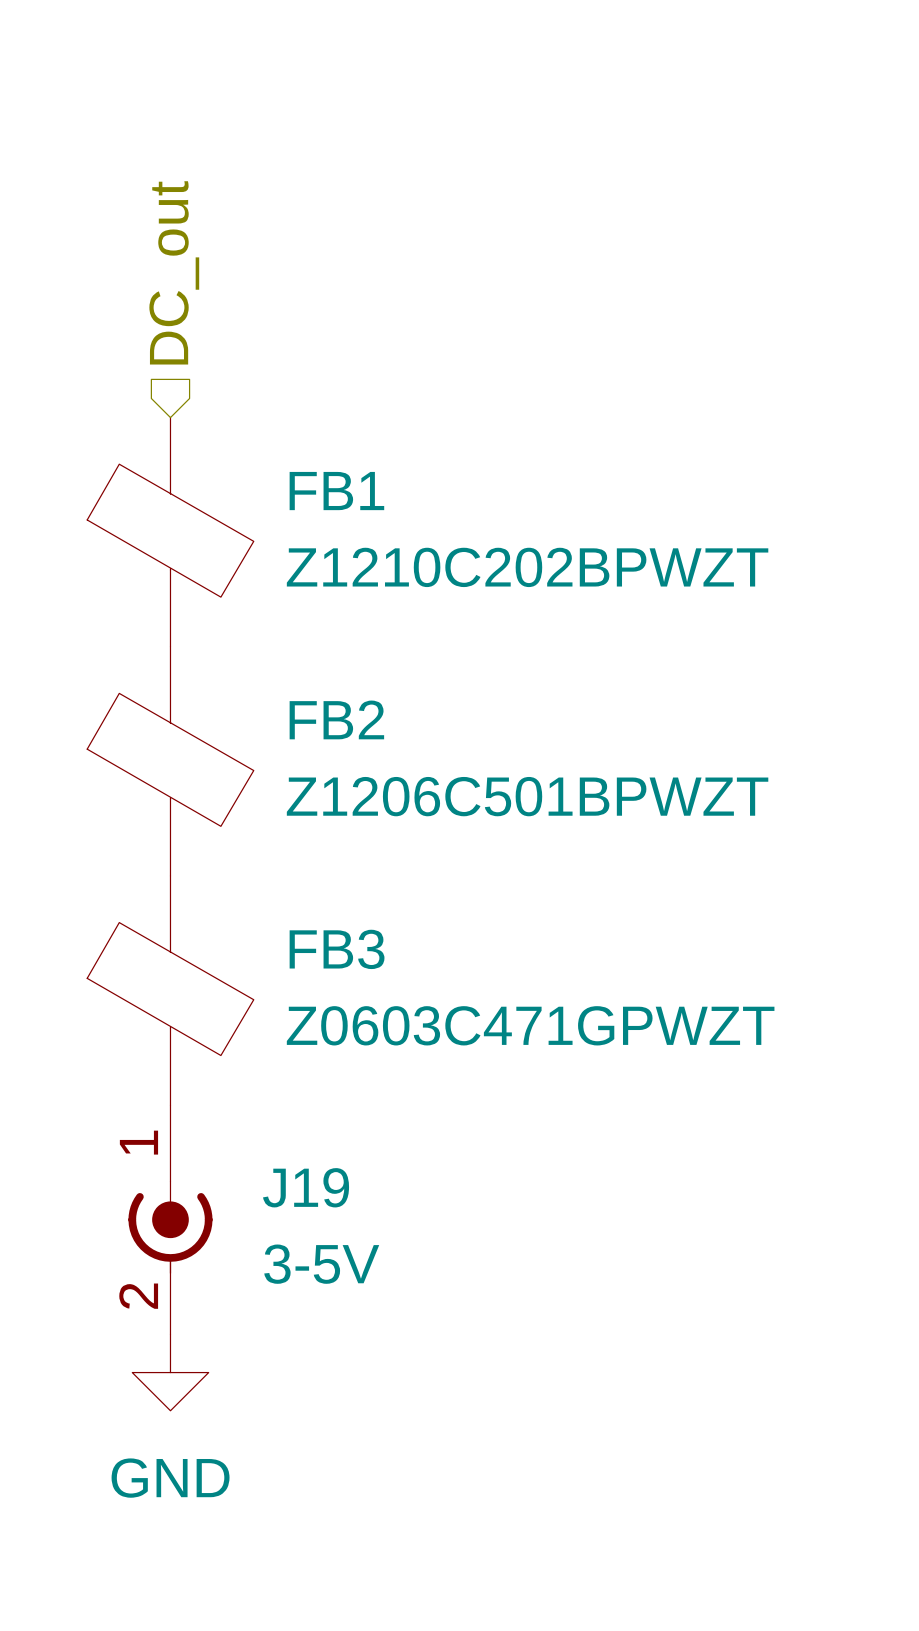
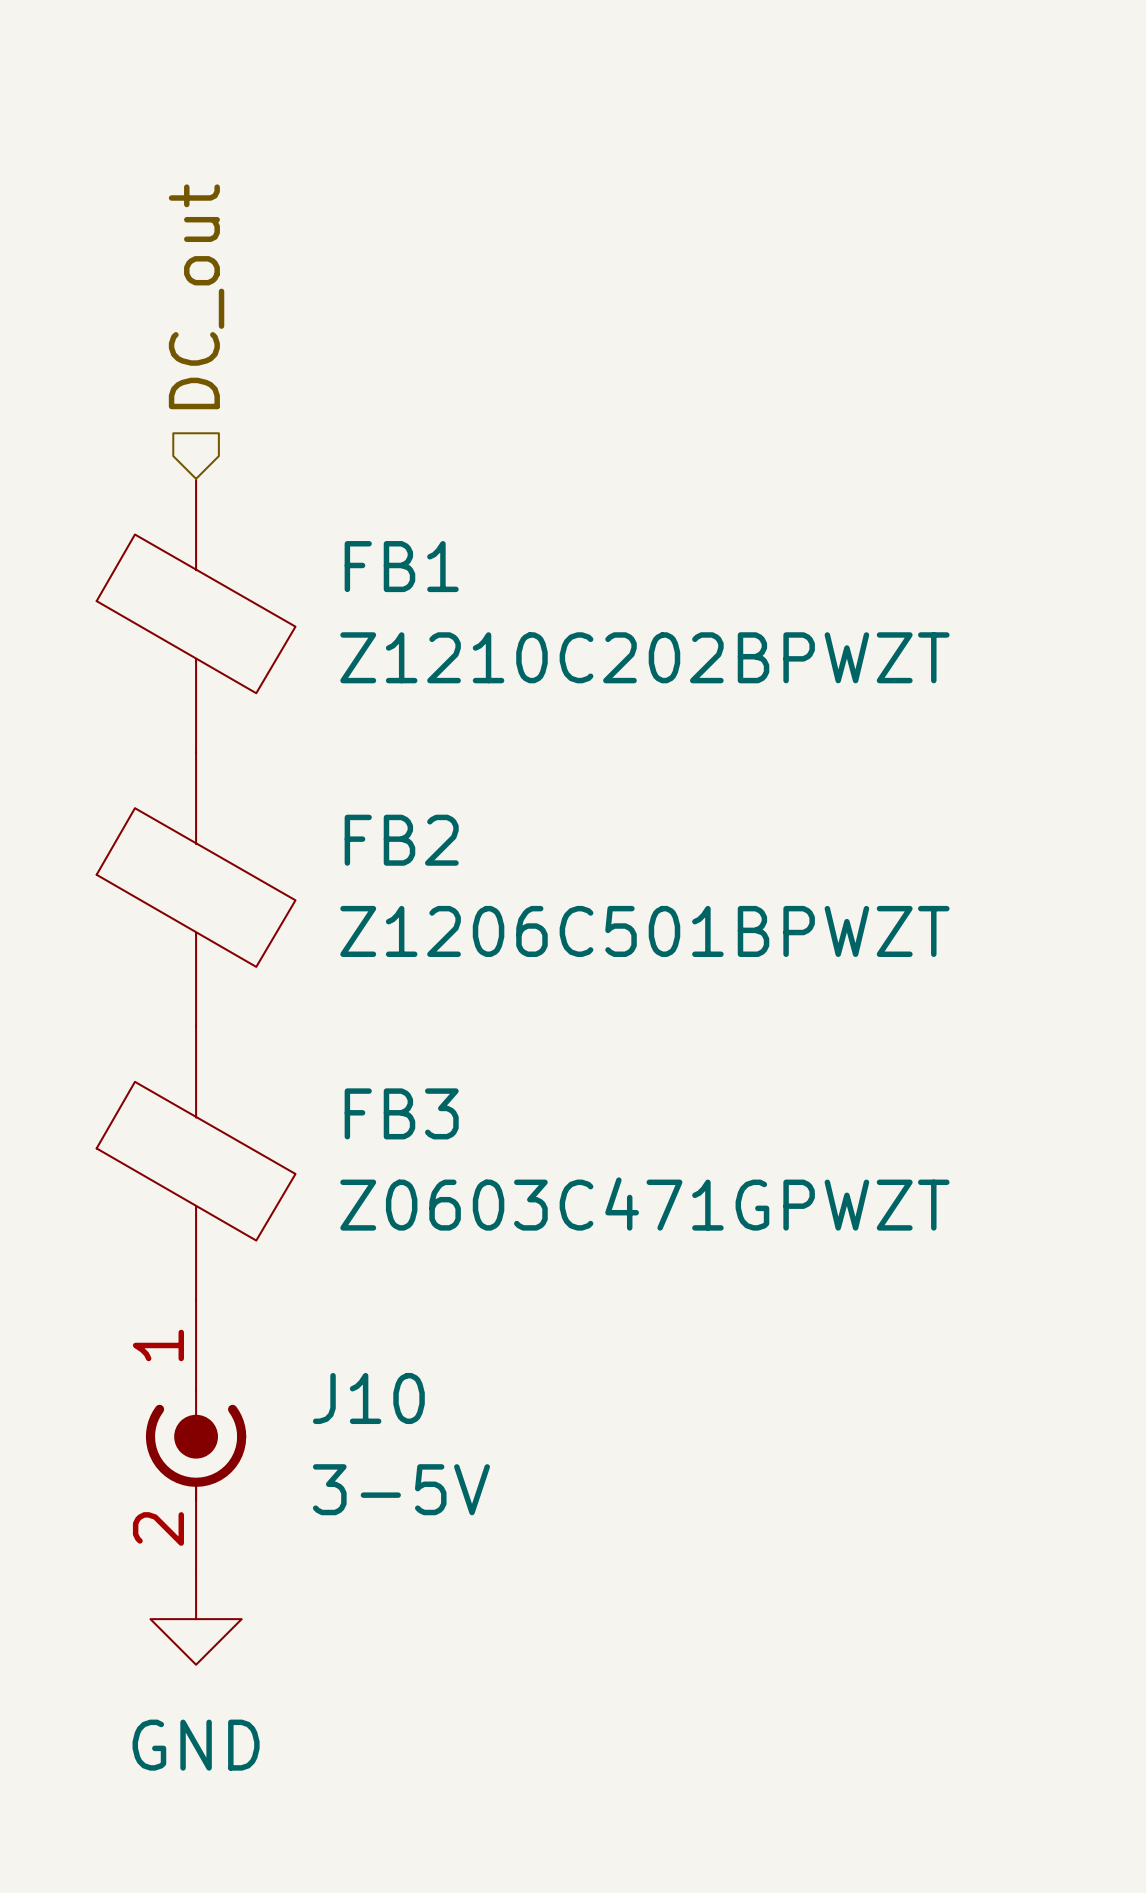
J19 name: J19 (306, 1187) -> J10 (368, 1398)

